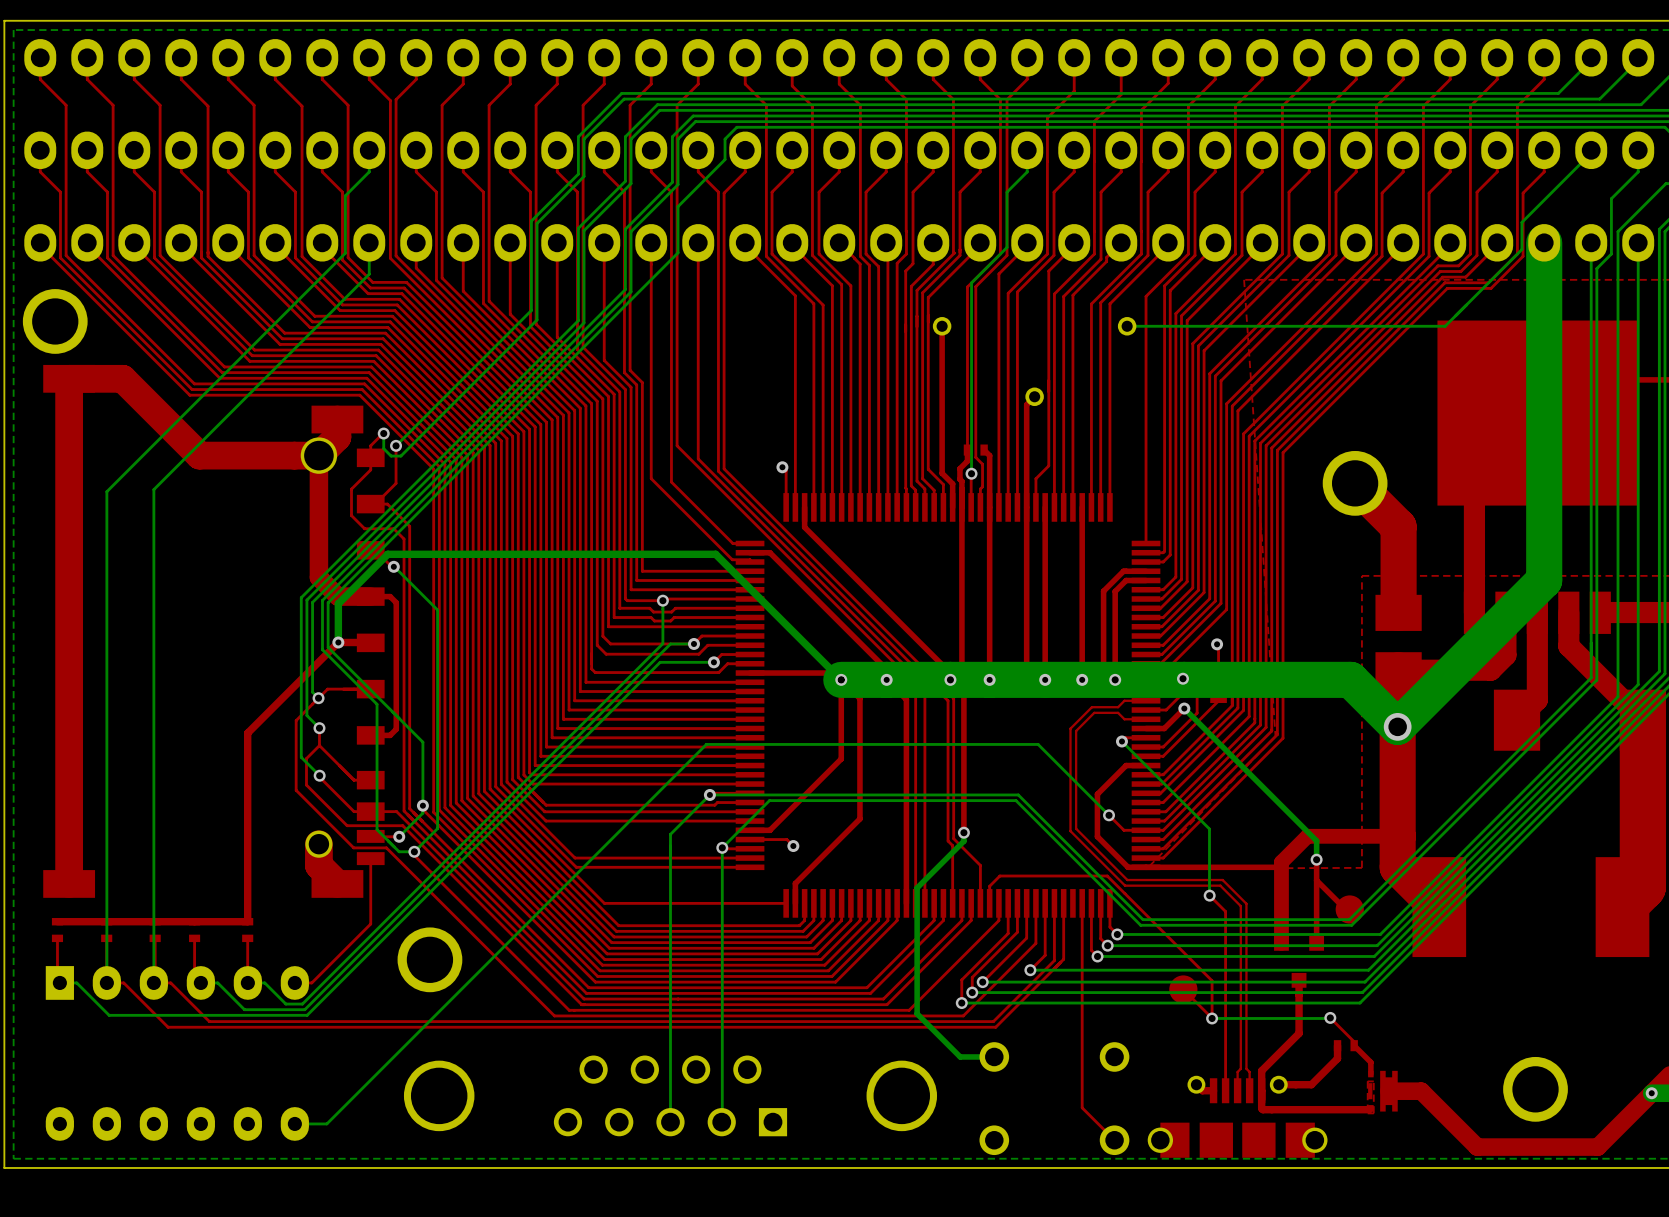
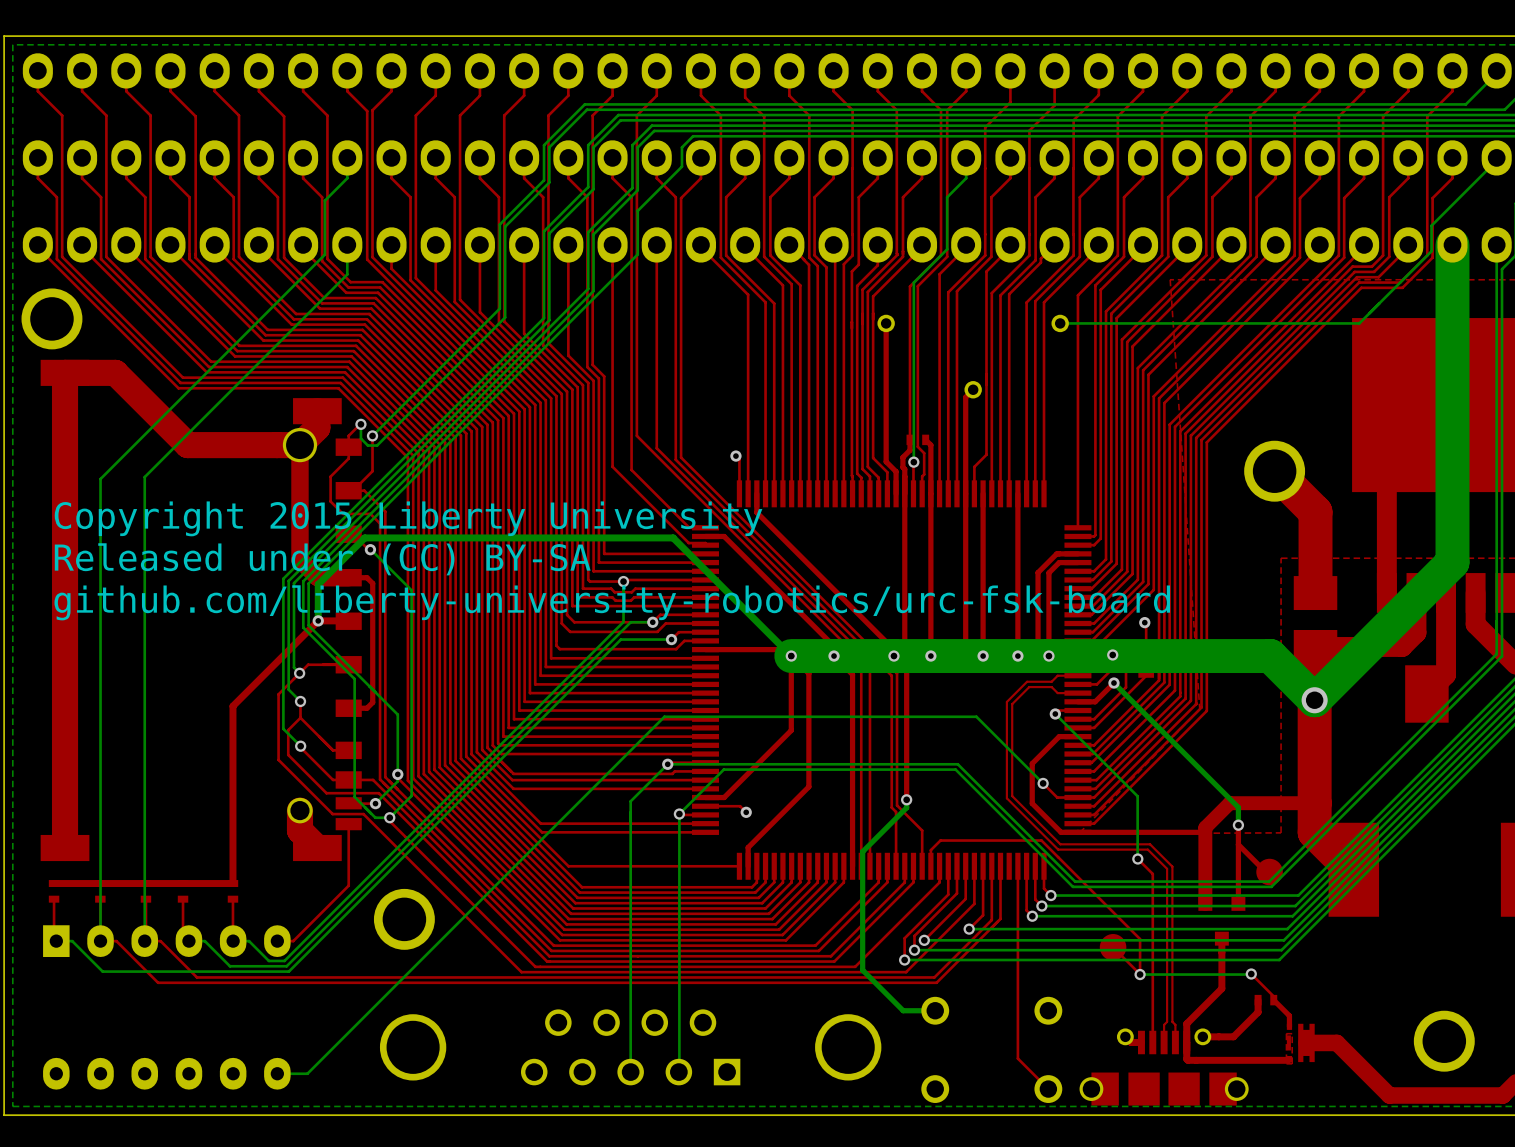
text: none -> Copyright 2015 Liberty University (408, 518)
text: none -> Released under (CC) BY-SA (322, 559)
text: none -> github.com/liberty-university-robotics/urc-fsk-board (612, 602)

